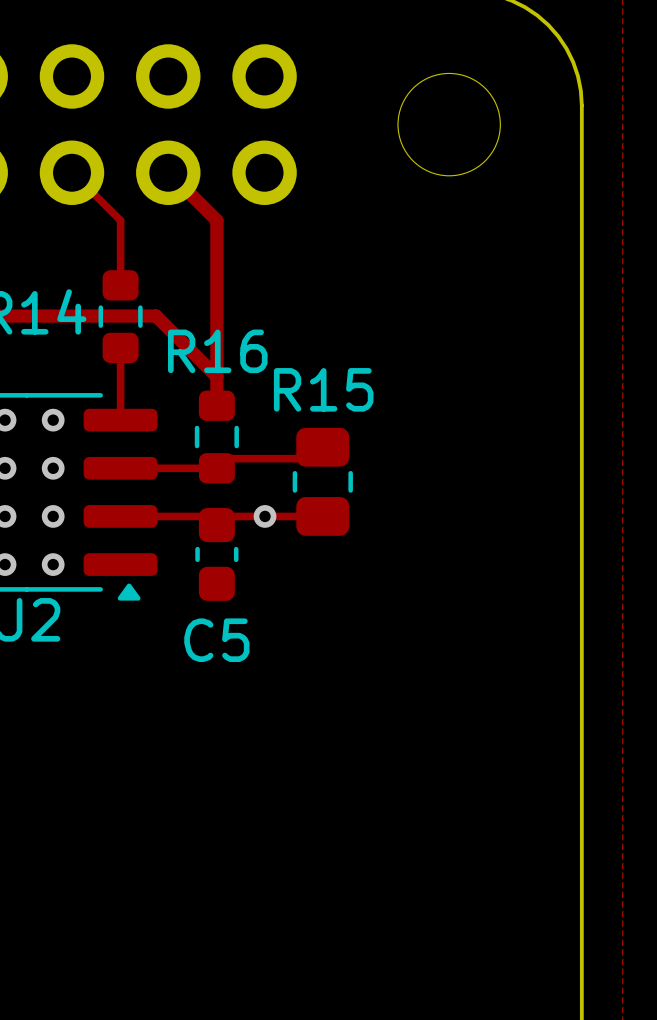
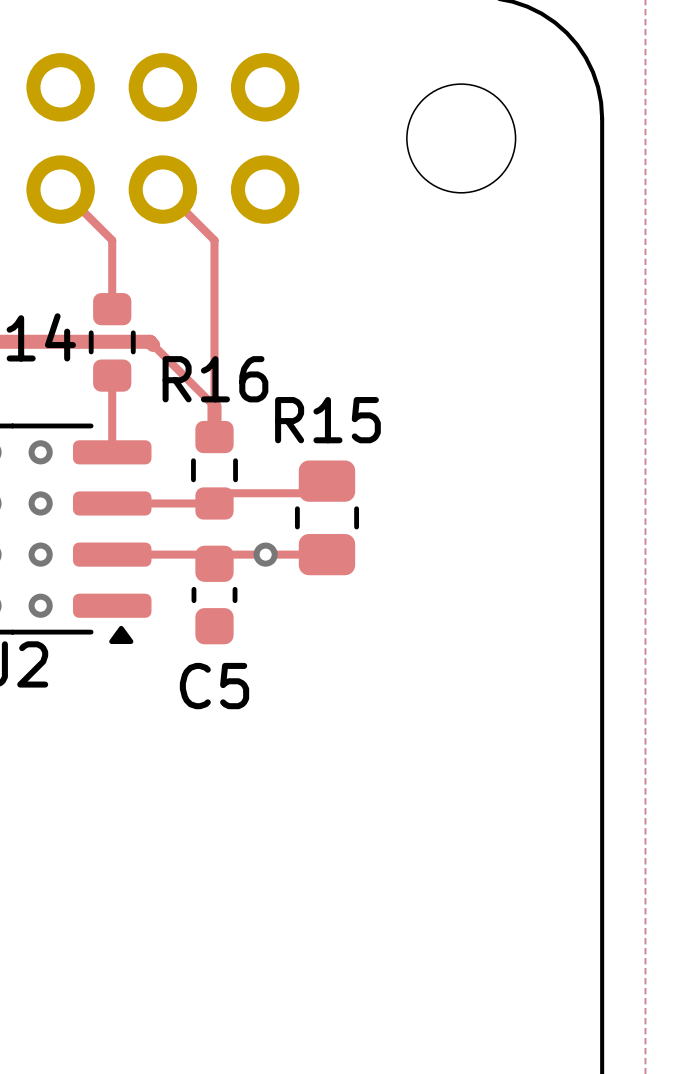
top track width: thick (173, 176) (216, 220) (216, 376) (159, 319) -> thin (167, 193) (214, 240) (214, 406) (153, 344)

